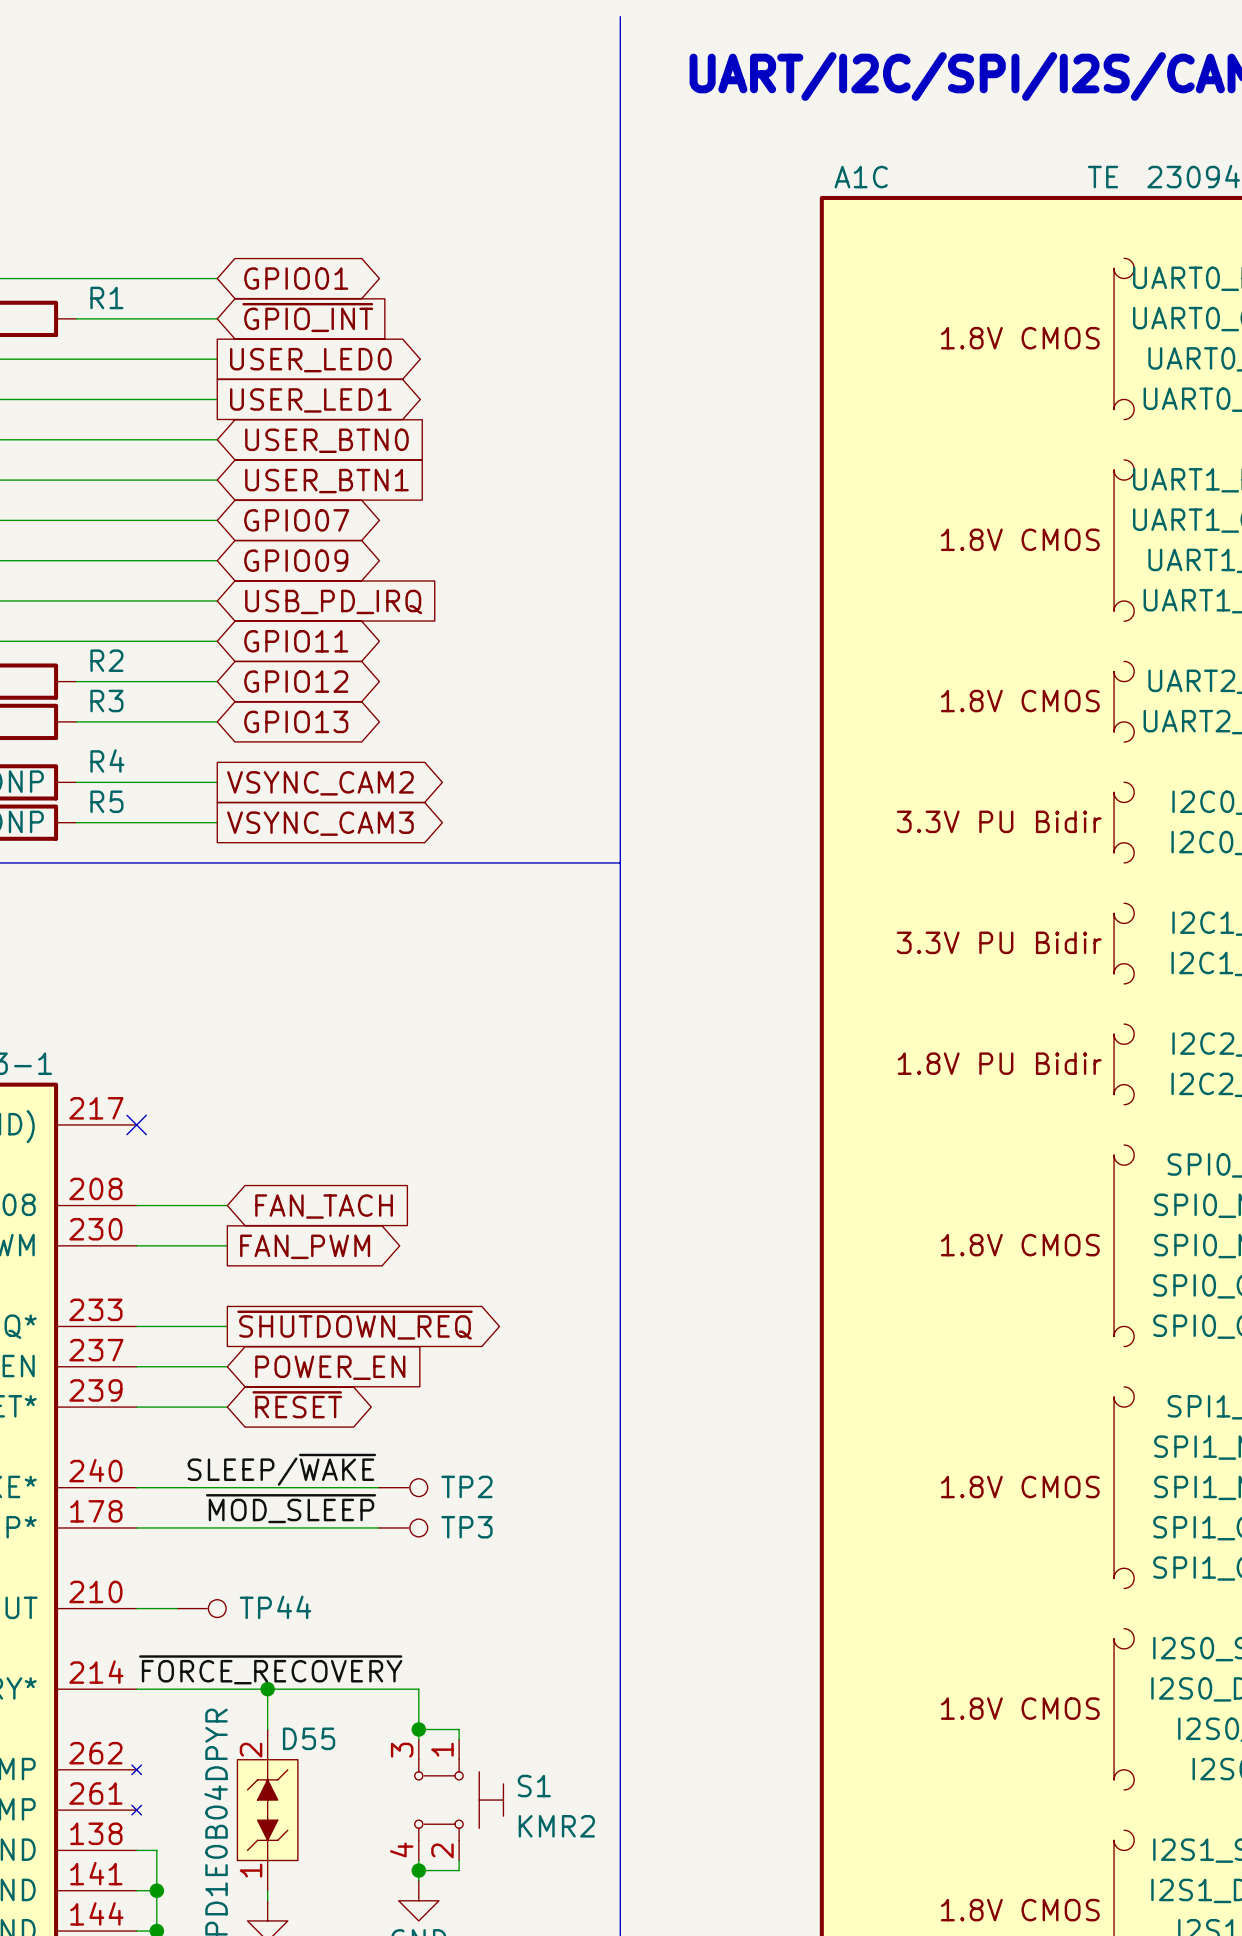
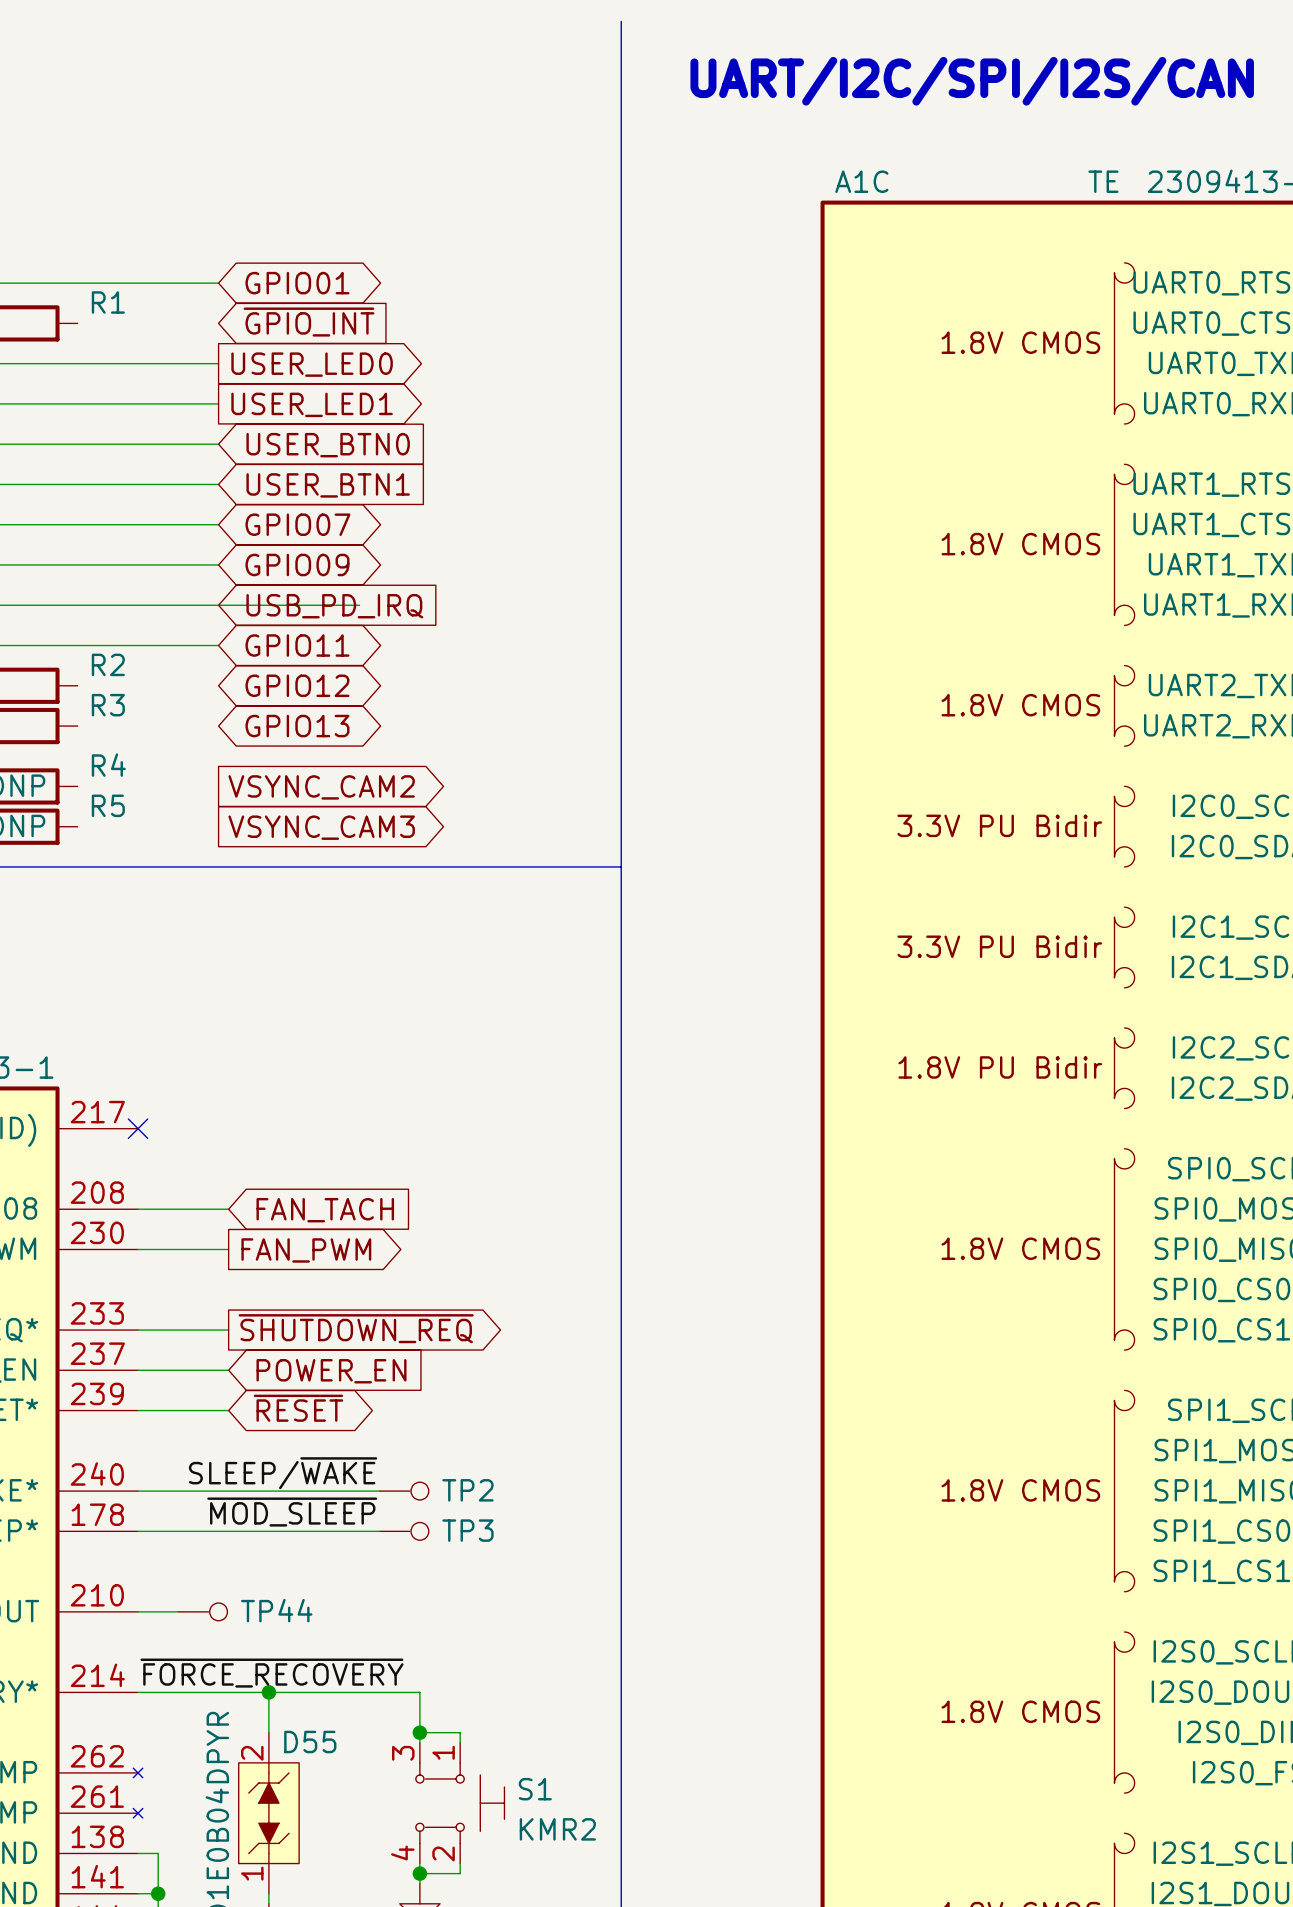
wire: (76, 318) (217, 318) -> none
wire: (76, 681) (217, 681) -> (218, 605) (359, 605)
wire: (76, 721) (217, 721) -> none
wire: (76, 782) (217, 782) -> none
wire: (76, 822) (217, 822) -> none

